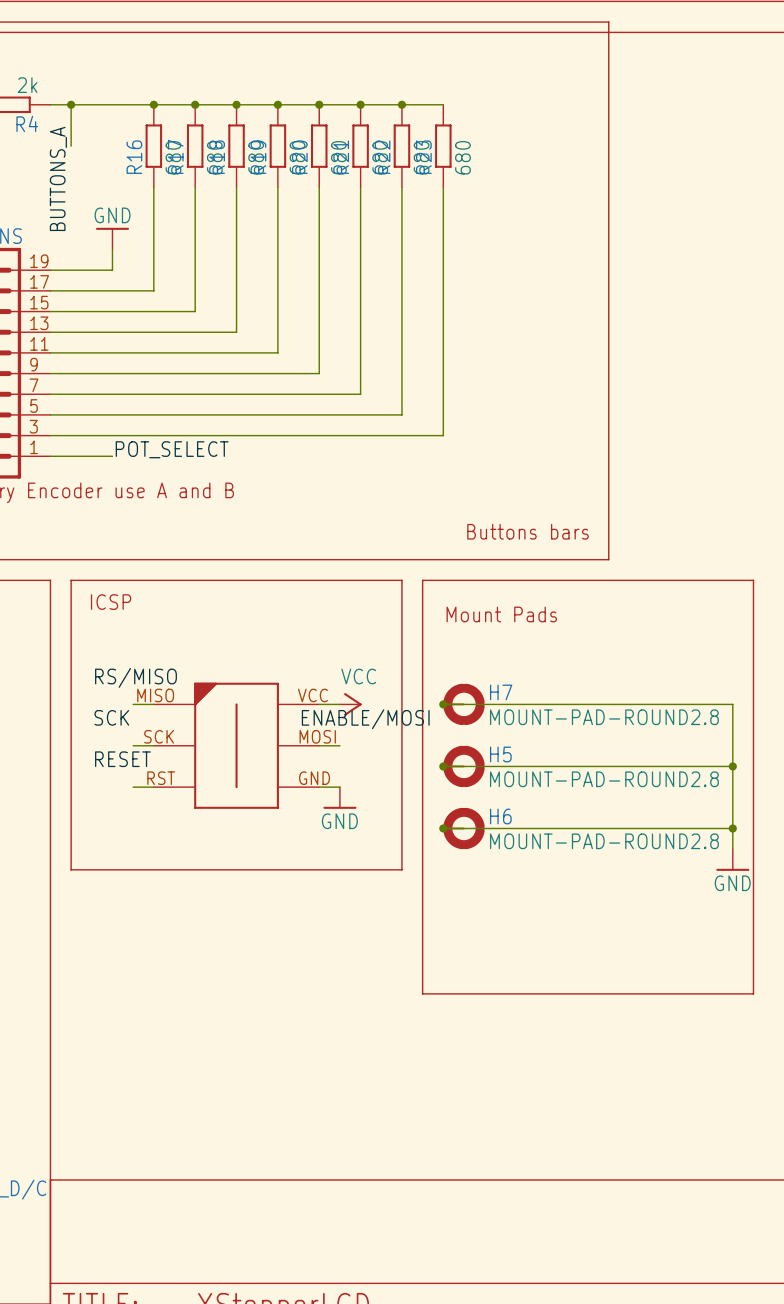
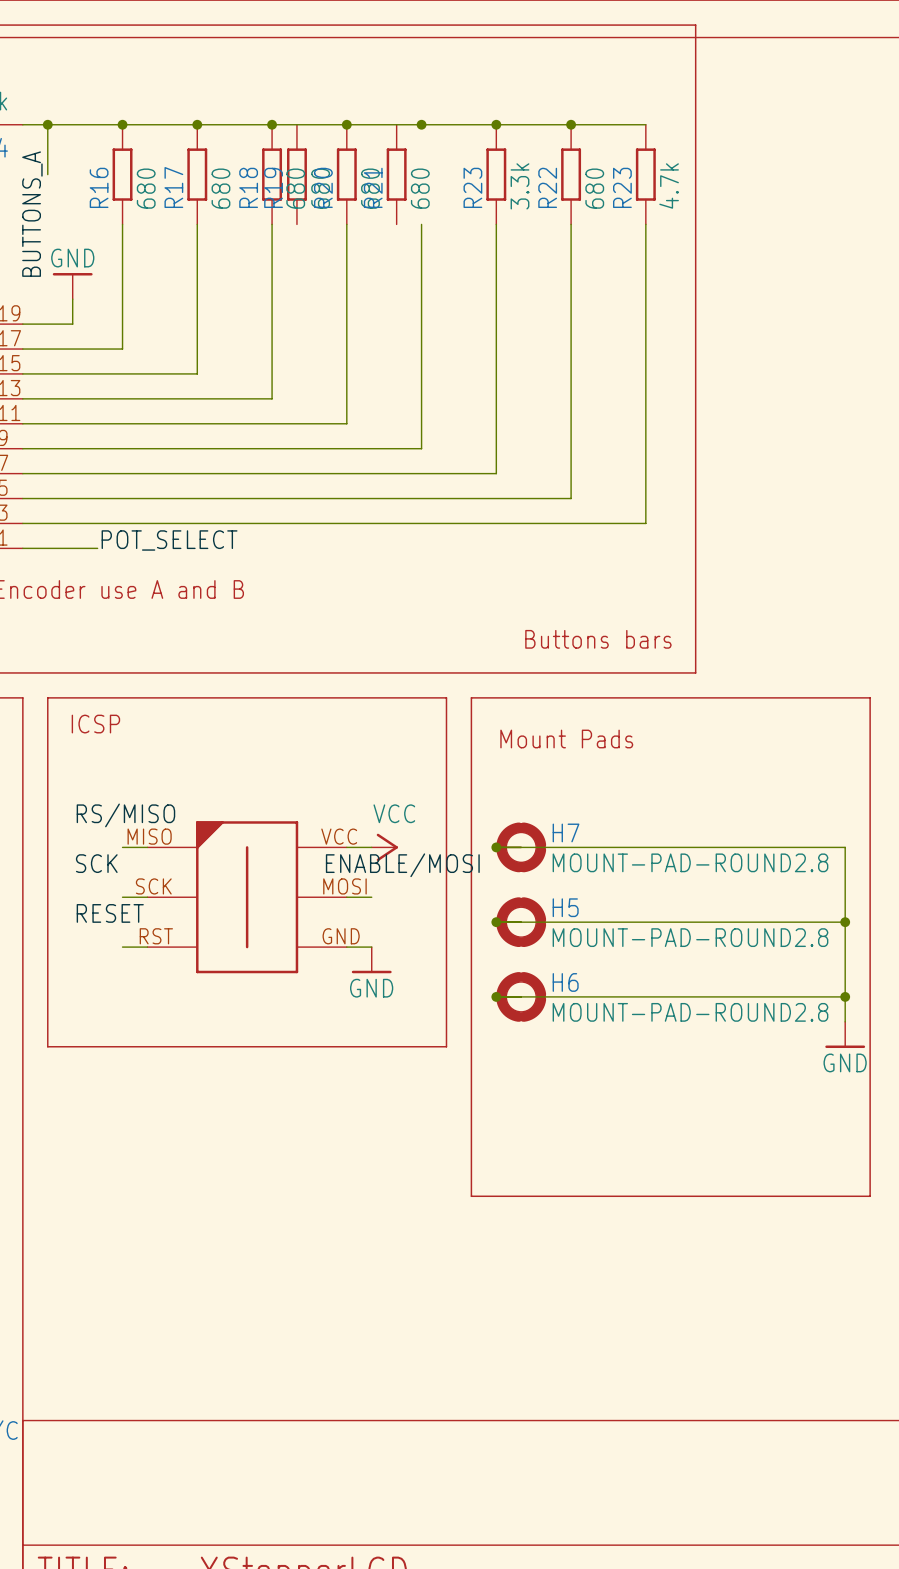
junction position: (153, 104) -> (122, 124)
junction: (236, 104) -> none
junction: none -> (272, 124)
junction: (277, 104) -> none
junction: (360, 104) -> none
junction: none -> (421, 124)
junction: (401, 104) -> none
wire: none -> (496, 124) (645, 124)
junction: none -> (496, 124)
junction: none -> (571, 124)
R16 position: (153, 146) -> (122, 174)
R18 position: (236, 146) -> (272, 174)
R22 position: (401, 146) -> (571, 174)
R23: none -> 4.7k (645, 174)
R23 value: 680 (462, 157) -> 3.3k (520, 186)
wire: (153, 187) (153, 290) (133, 290) -> (122, 224) (122, 349)
wire: (236, 187) (236, 332) -> (272, 224) (272, 398) (247, 398)
wire: (277, 187) (277, 352) -> none
wire: (360, 187) (360, 394) -> none
wire: none -> (421, 224) (421, 448) (346, 448)
wire: (401, 187) (401, 414) -> (571, 224) (571, 498) (446, 498)
wire: none -> (645, 224) (645, 523) (496, 523)
power symbol position: GND (112, 238) -> GND (72, 286)
wire: (112, 249) (112, 270) (91, 270) -> (72, 299) (72, 324)
wire: (319, 352) (319, 373) -> (346, 423) (296, 423)
wire: (443, 394) (443, 435) -> (496, 473) (396, 473)

